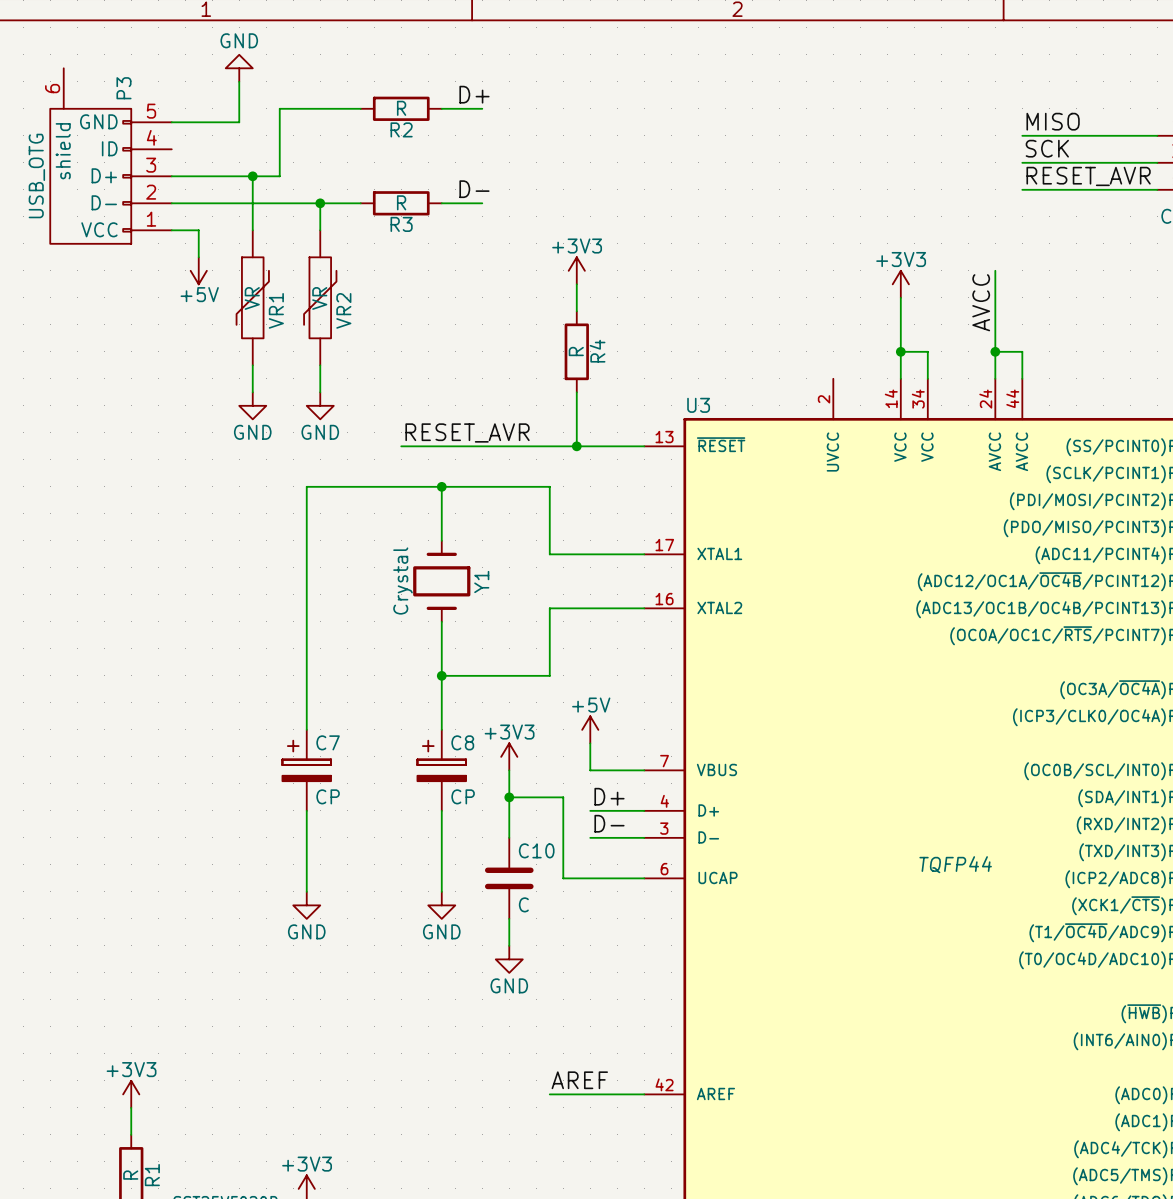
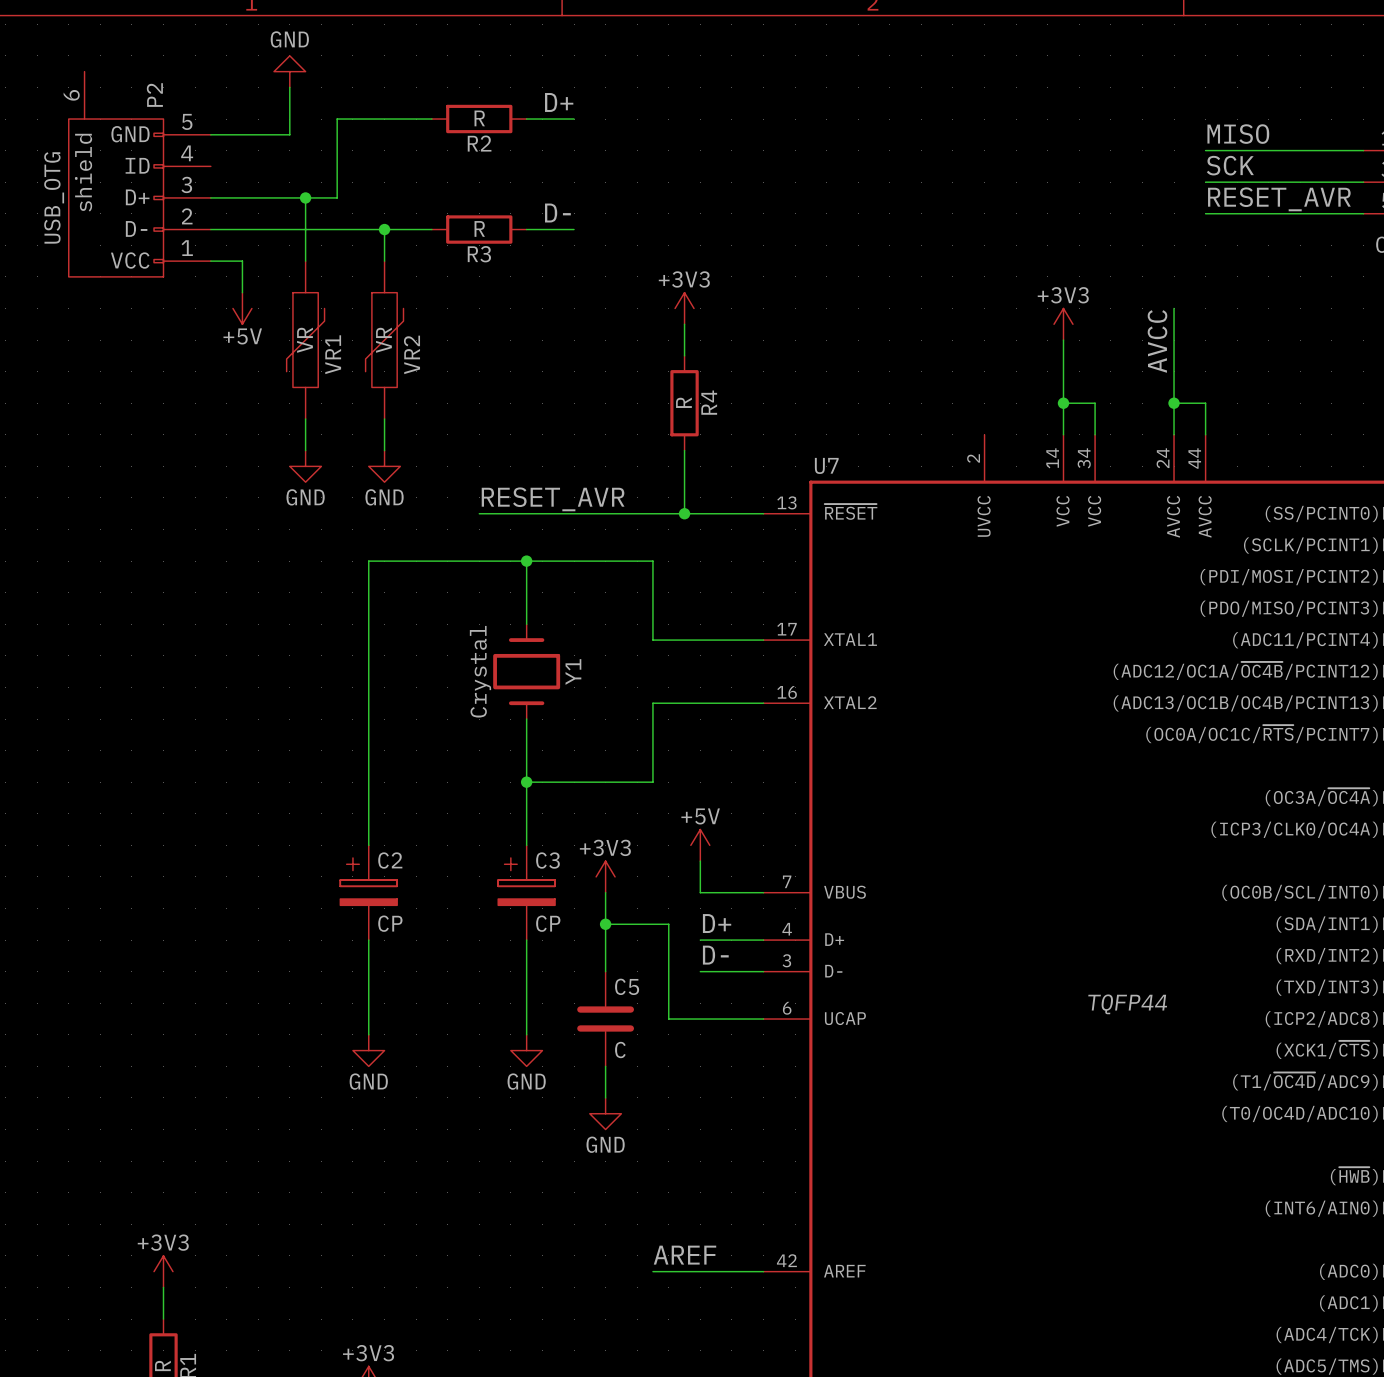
P3 name: P3 (123, 88) -> P2 (154, 95)
U3 name: U3 (698, 405) -> U7 (826, 465)
C7 name: C7 (328, 742) -> C2 (390, 860)
C8 name: C8 (462, 742) -> C3 (547, 860)
C10 name: C10 (536, 850) -> C5 (627, 986)

